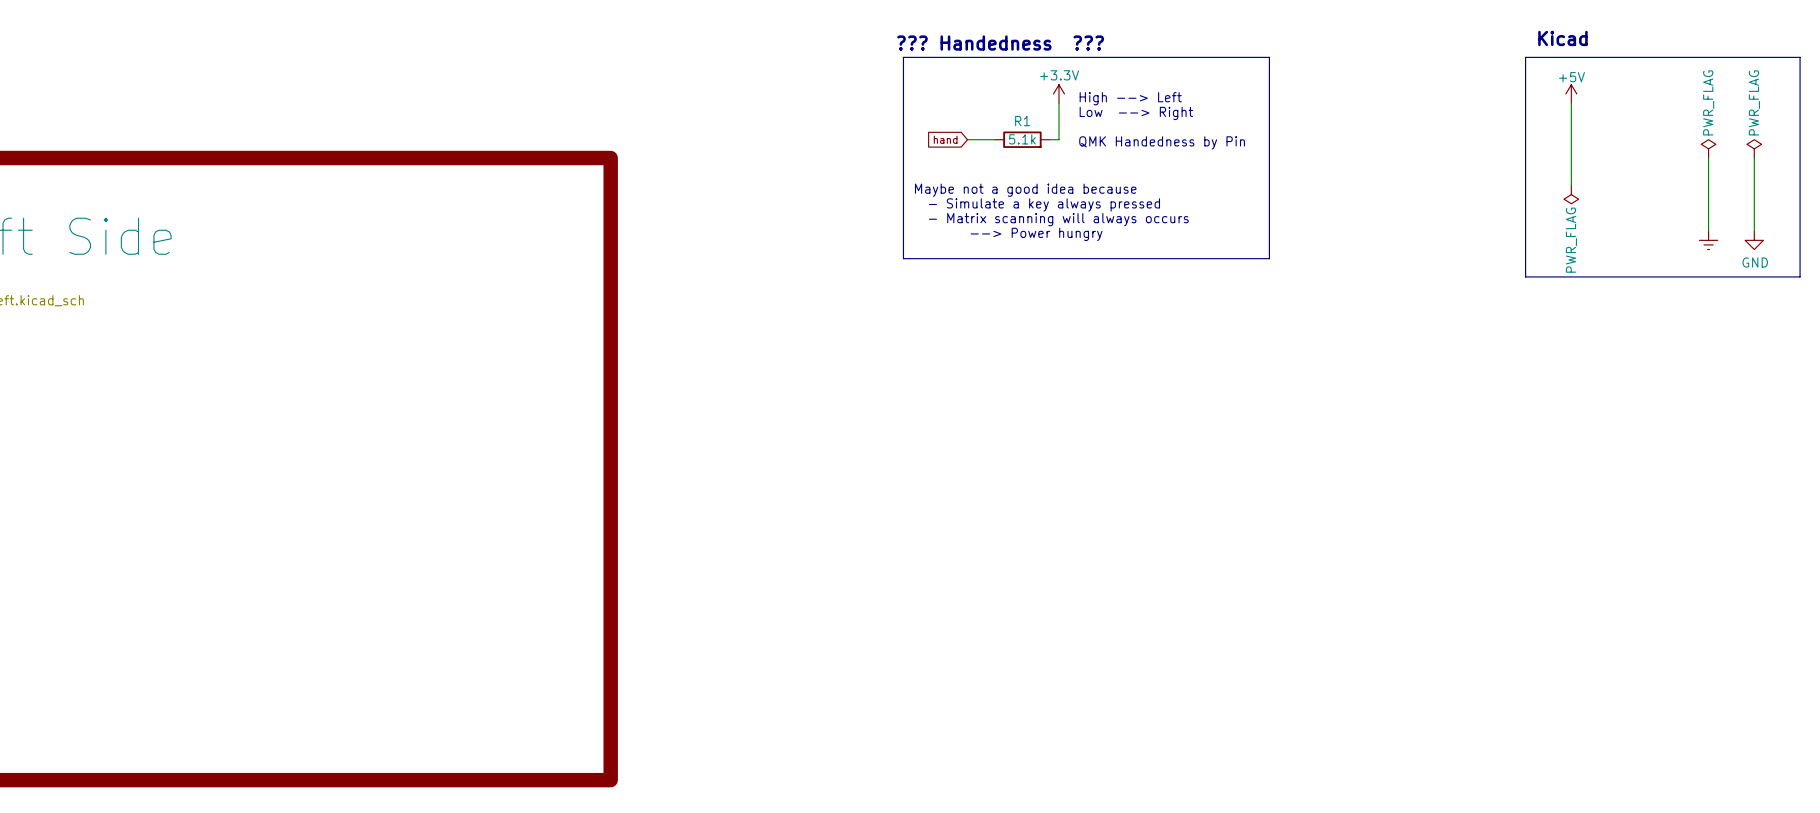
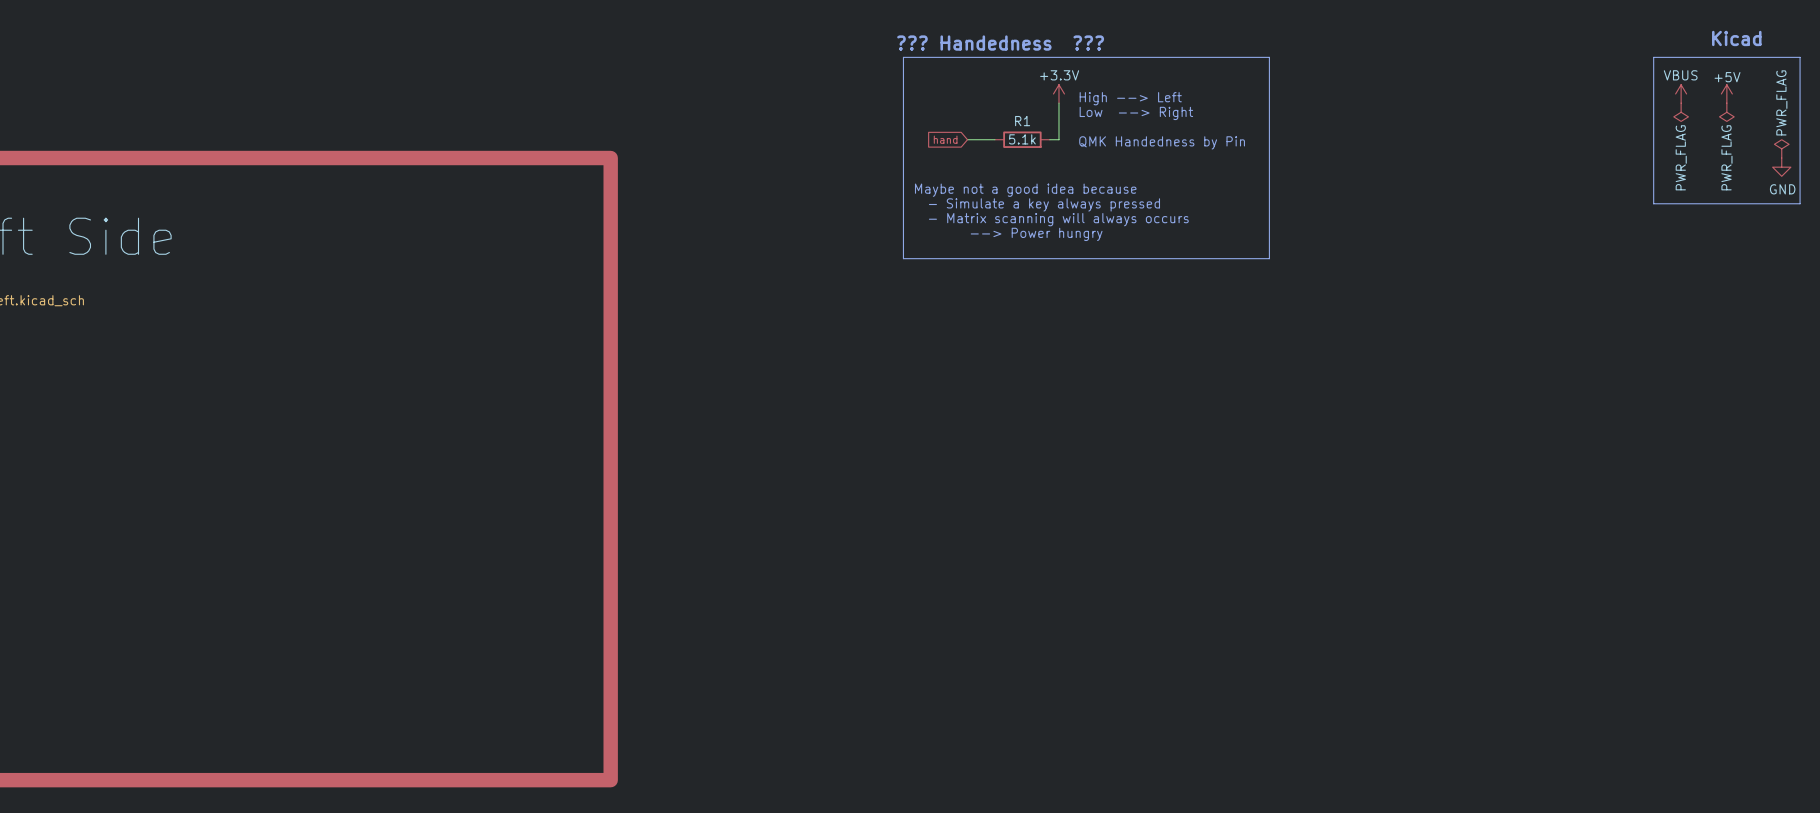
text position: Kicad (1562, 38) -> Kicad (1736, 38)
line: (1653, 57) (1525, 57) (1525, 276) (1800, 276) (1800, 203) -> (1653, 57) (1653, 203) (1800, 203)
power symbol position: +5V (1571, 93) -> +5V (1726, 93)
power symbol: none -> VBUS (1681, 93)
wire: (1571, 103) (1571, 185) -> none
power symbol: none -> PWR_FLAG (1681, 112)
power symbol: none -> PWR_FLAG (1726, 112)
power symbol: PWR_FLAG (1708, 148) -> none
power symbol: PWR_FLAG (1754, 148) -> none
power symbol: none -> PWR_FLAG (1781, 148)
wire: (1708, 158) (1708, 231) -> none
wire: (1754, 158) (1754, 231) -> none
power symbol: PWR_FLAG (1571, 194) -> none
power symbol: (1708, 240) -> none
power symbol position: GND (1754, 240) -> GND (1781, 167)

